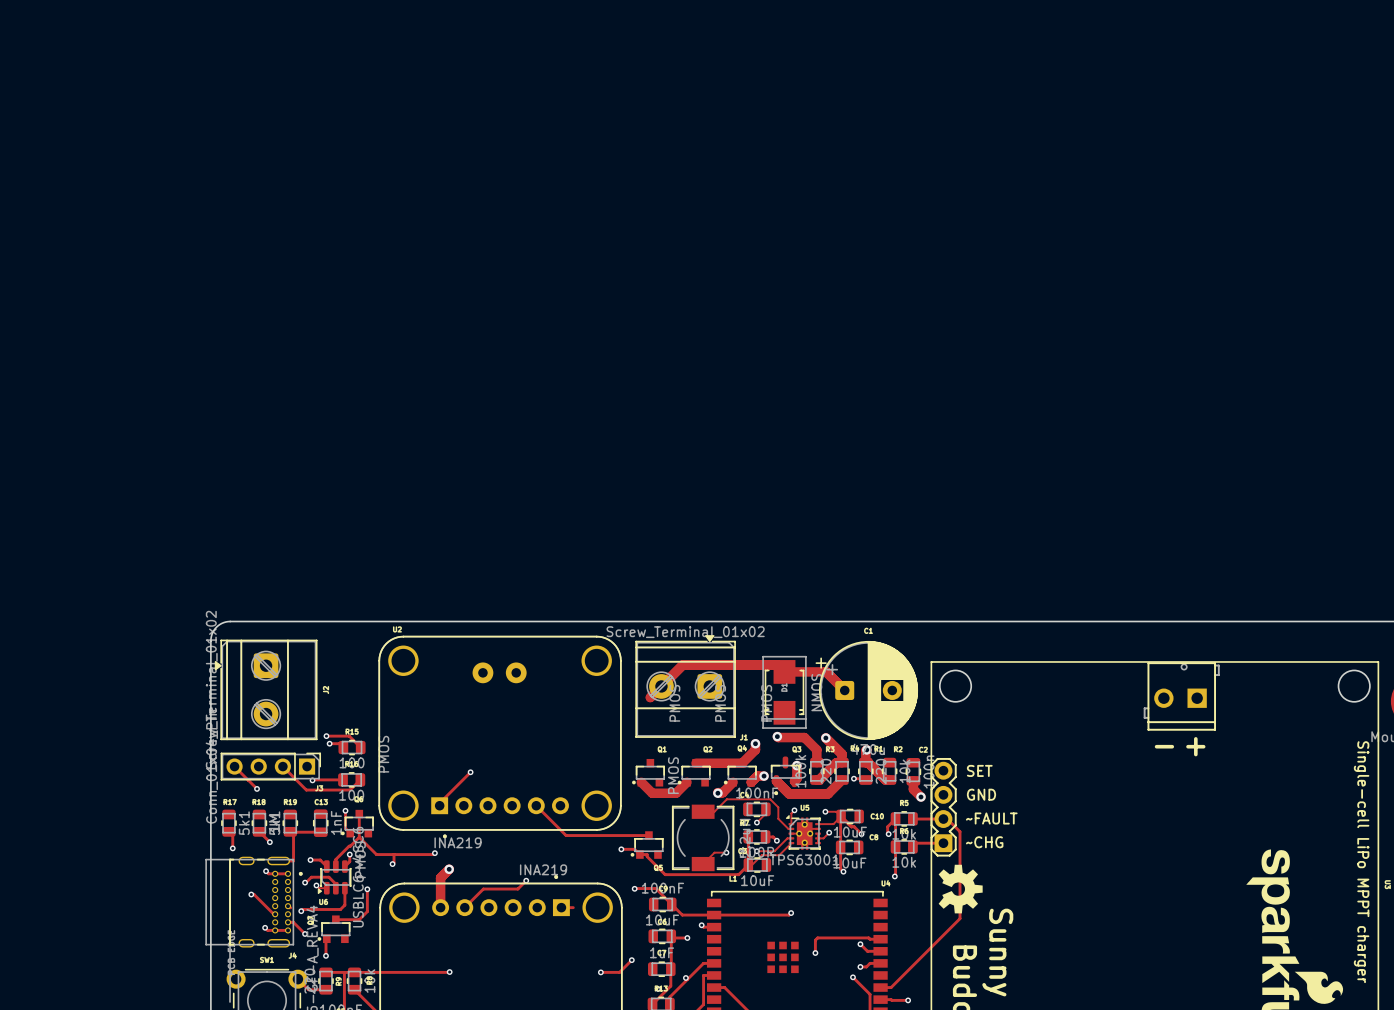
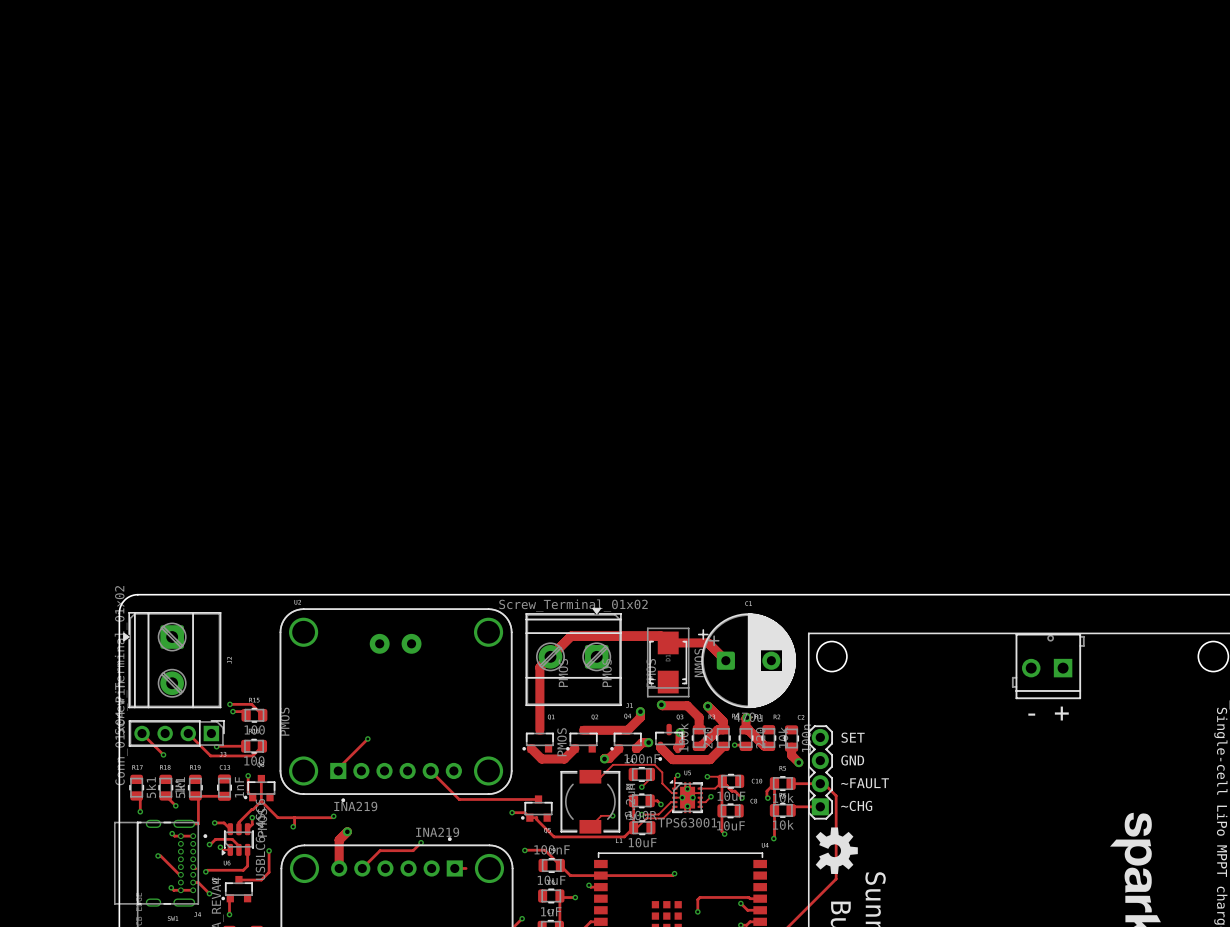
track: none -> (539, 667) (539, 730)

